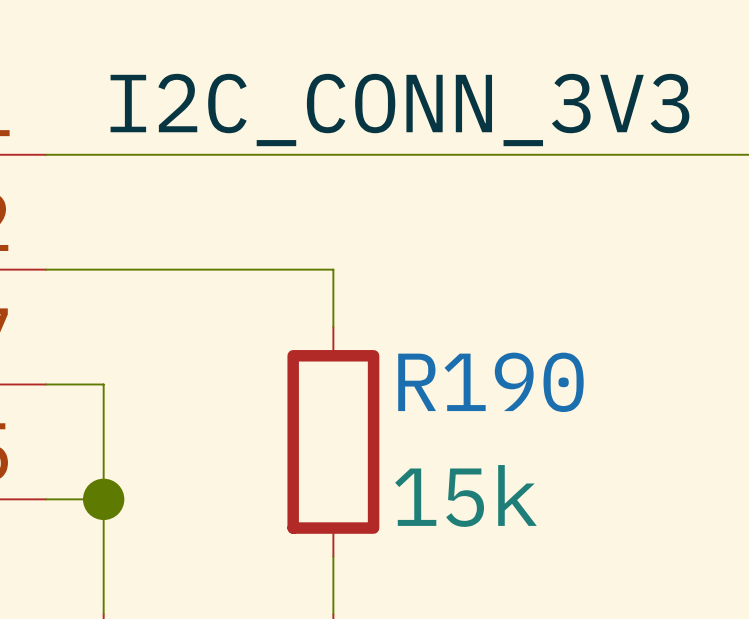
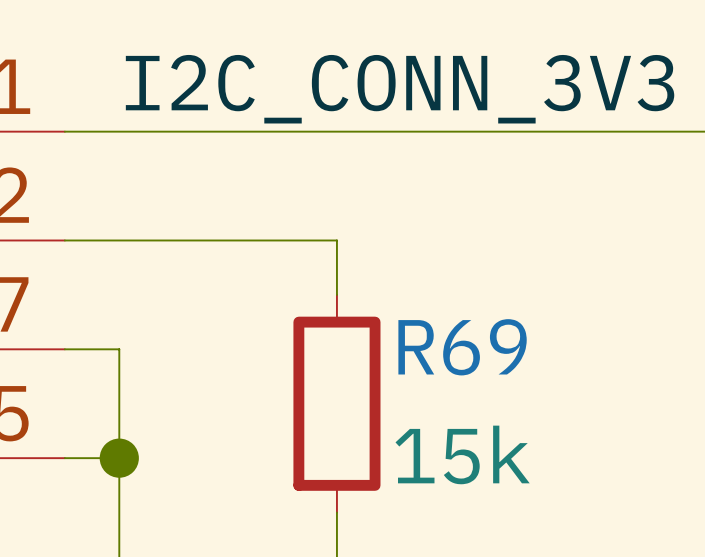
R190 name: R190 (490, 382) -> R69 (462, 347)

